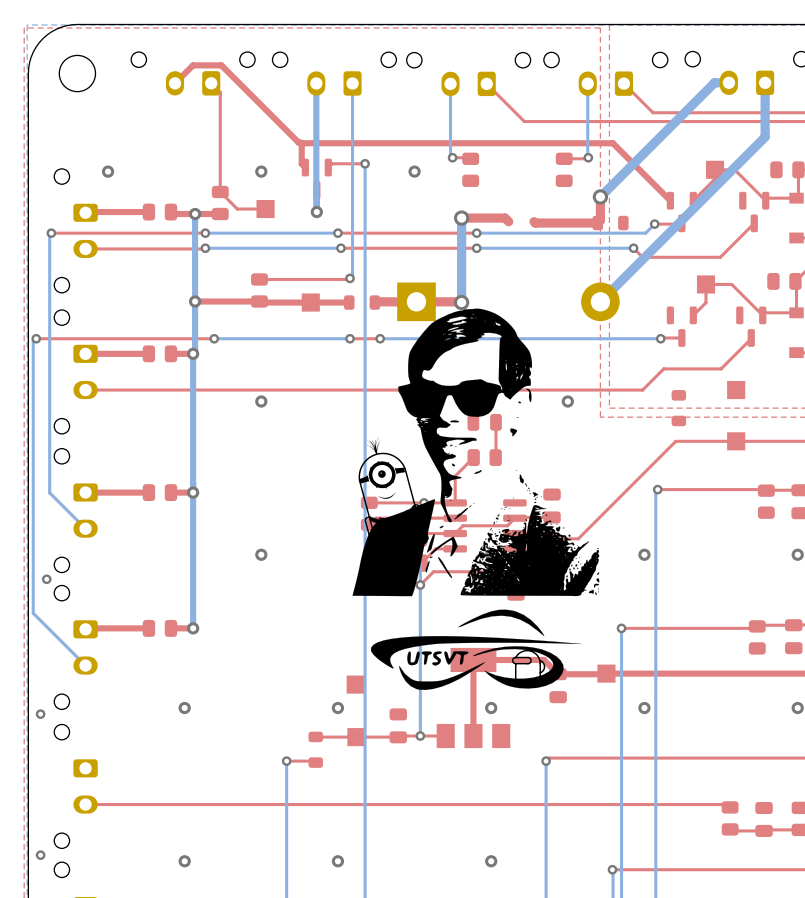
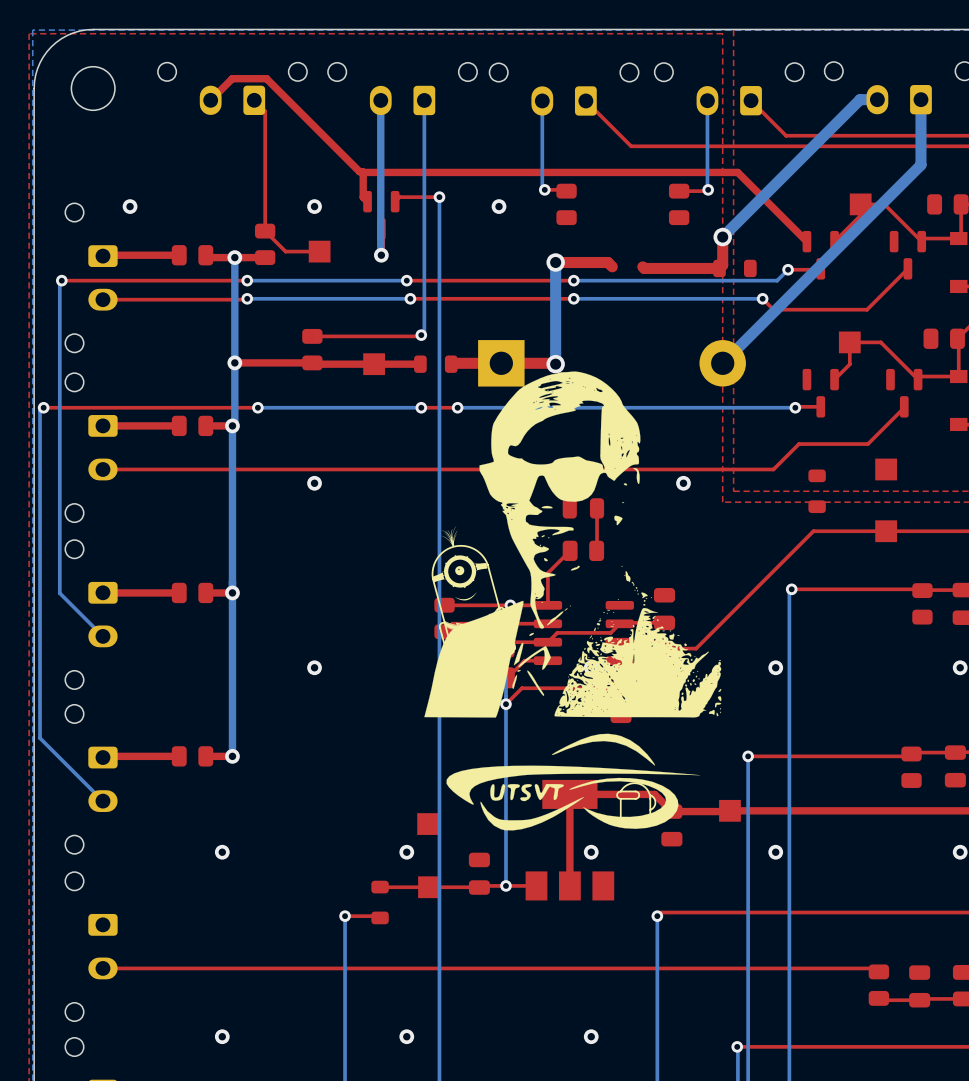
via: (46, 579) -> none
via: (40, 714) -> none
via: (40, 855) -> none

